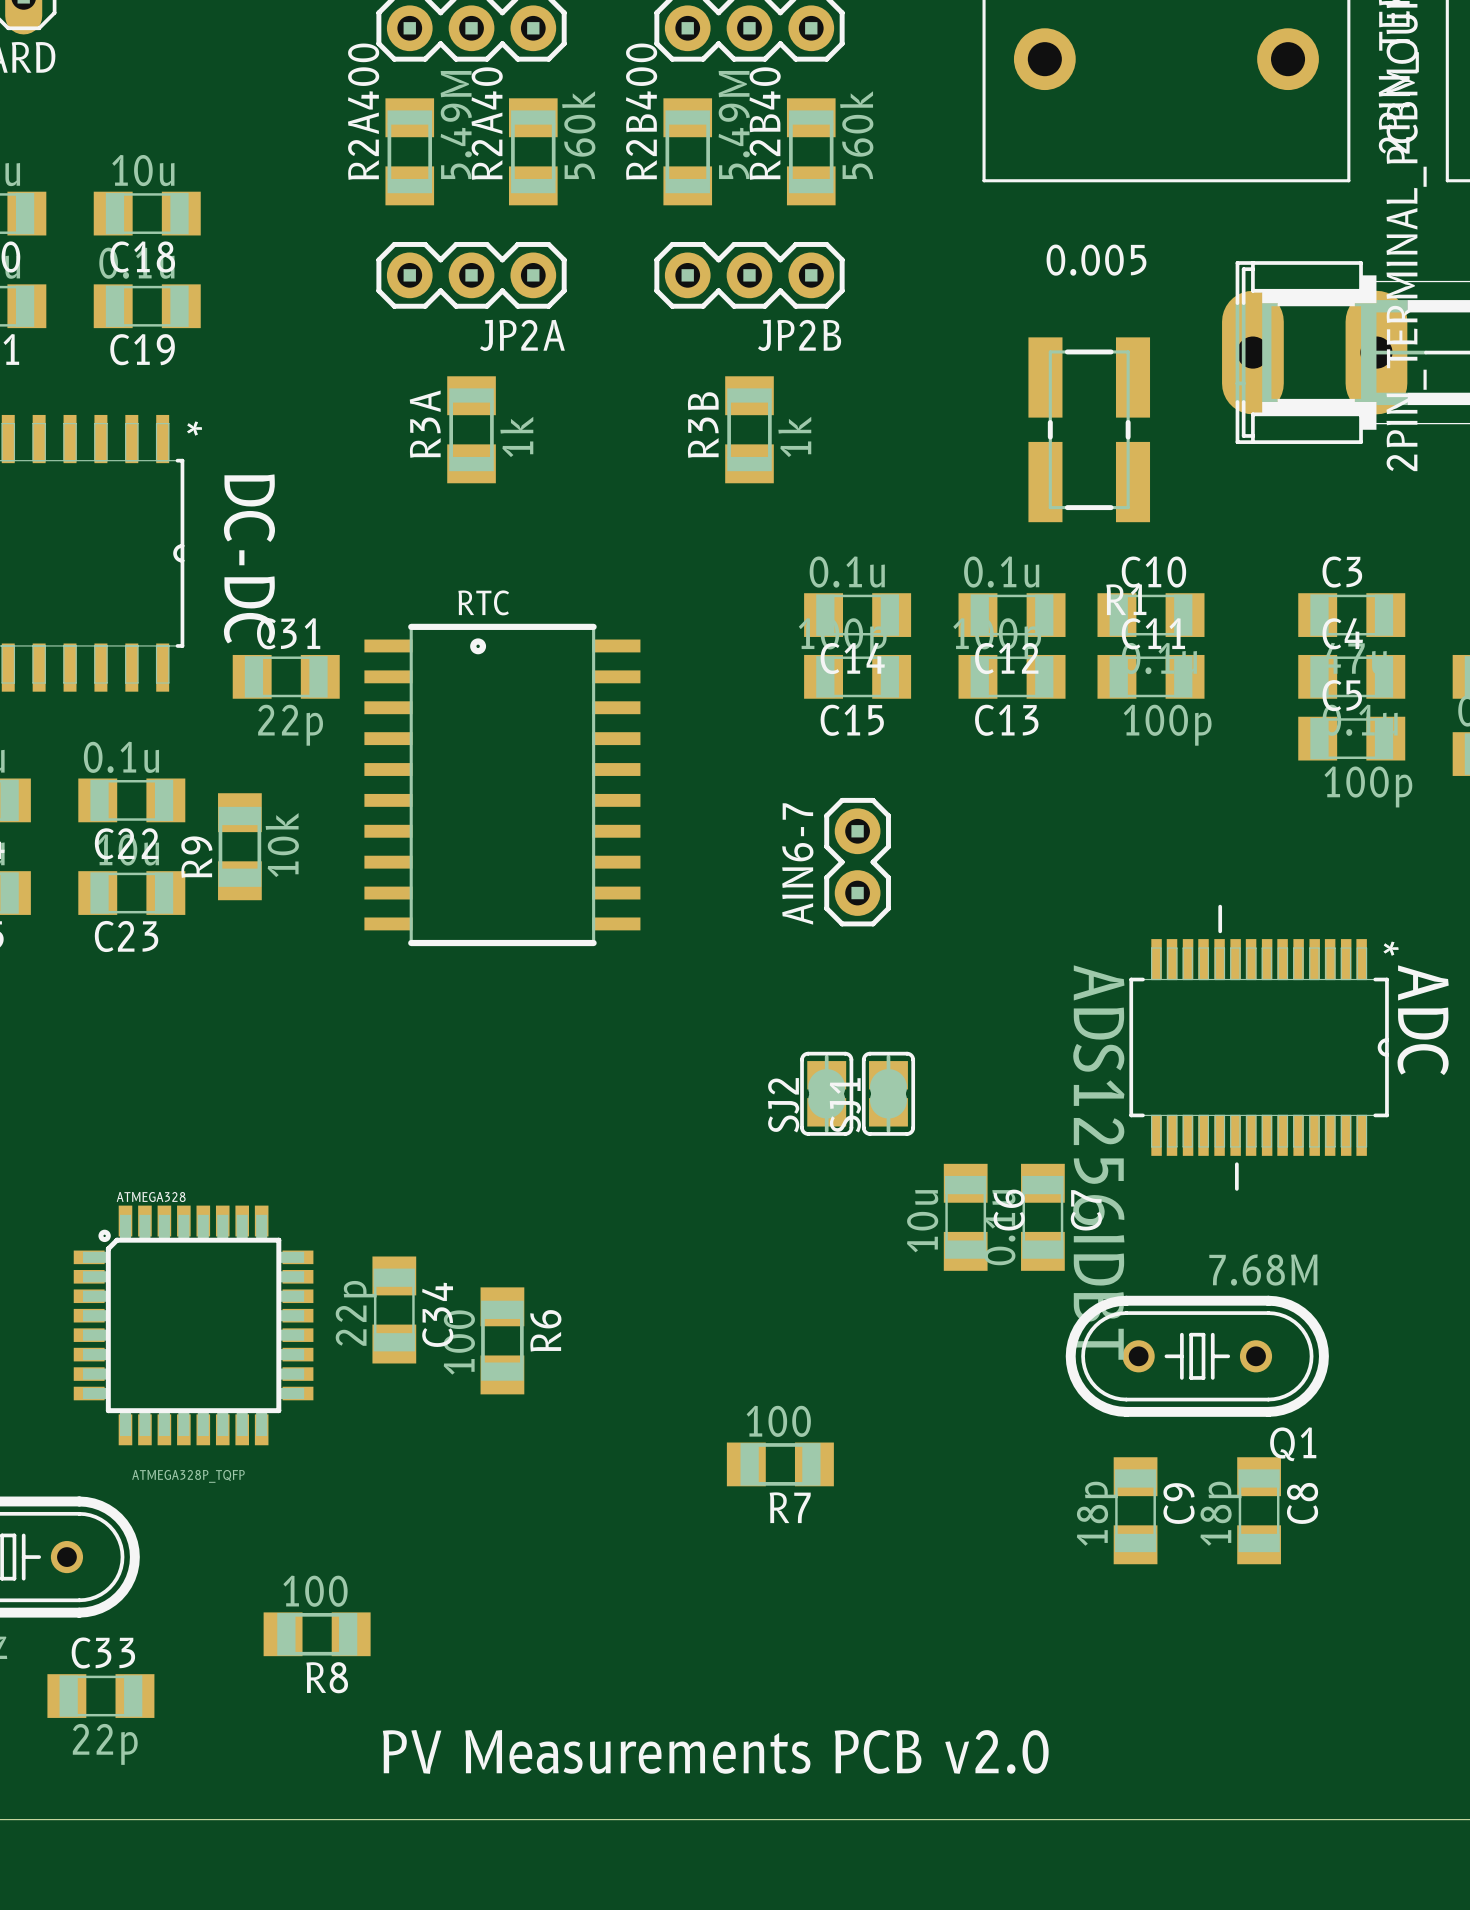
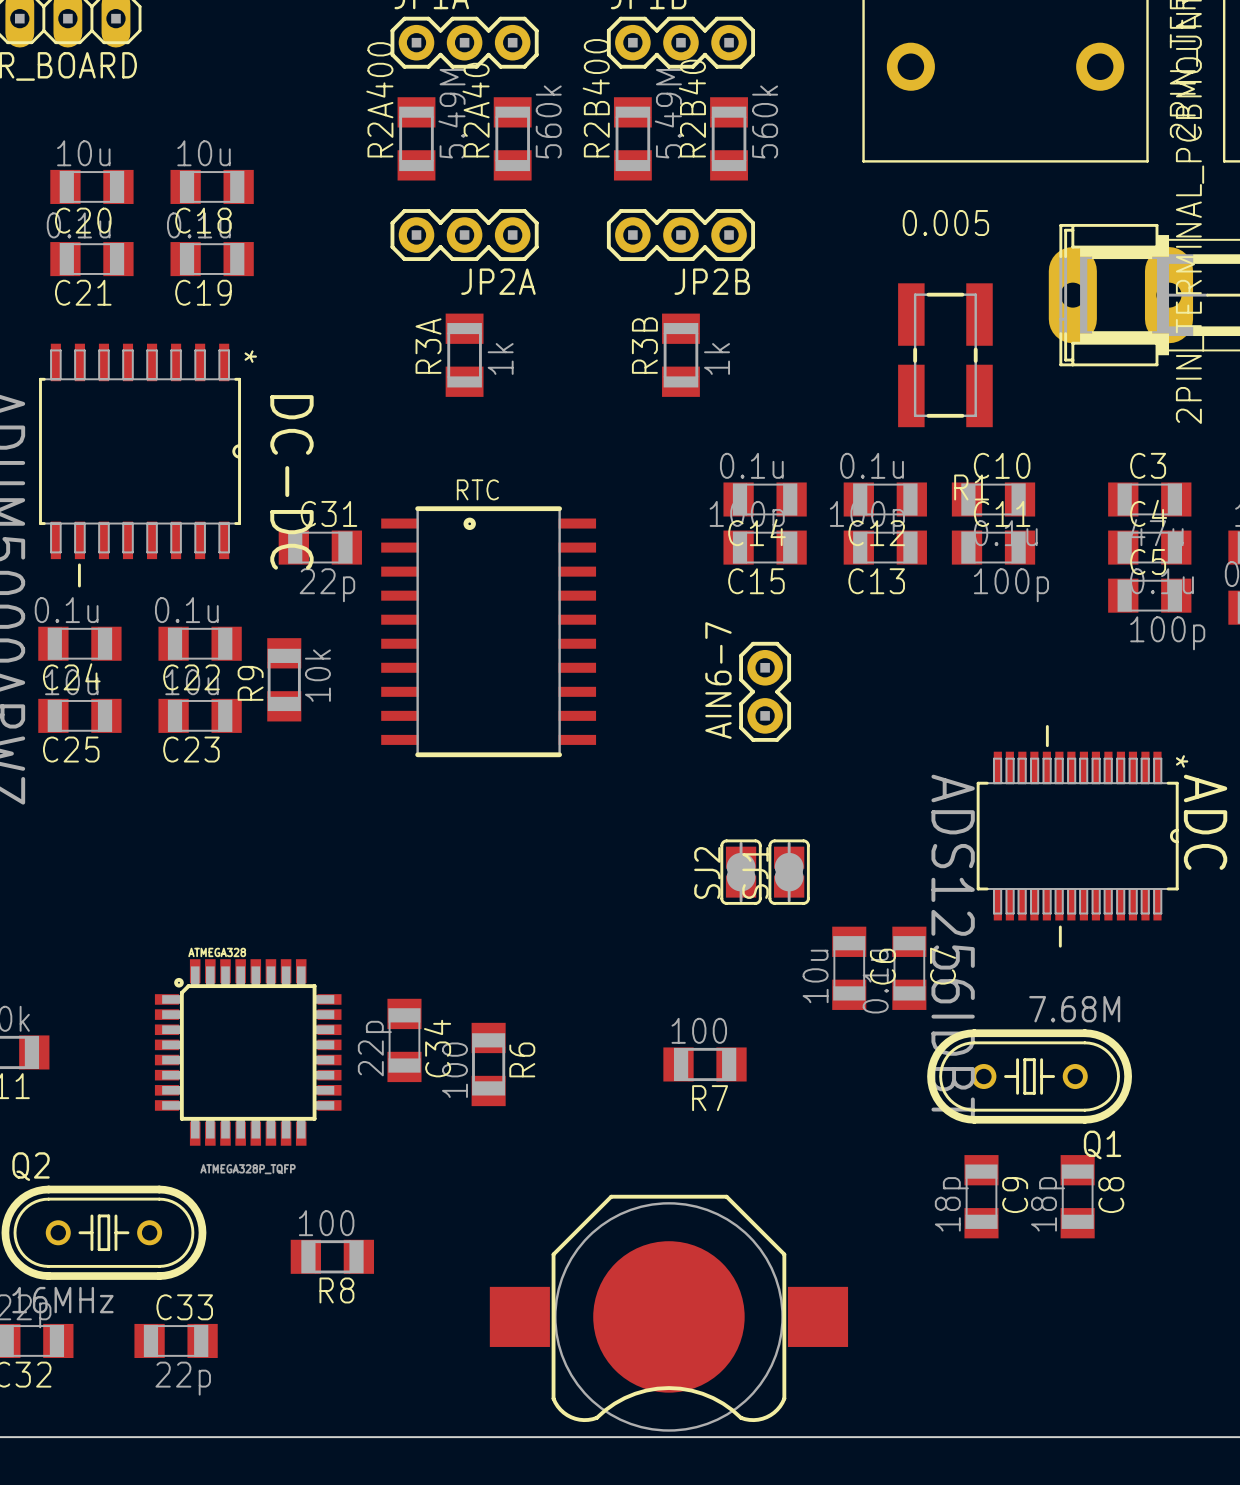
R7 position: (780, 1464) -> (705, 1064)
R8 position: (317, 1634) -> (332, 1256)
part: none -> (668, 1313)
text: PV Measurements PCB v2.0 (715, 1751) -> none

